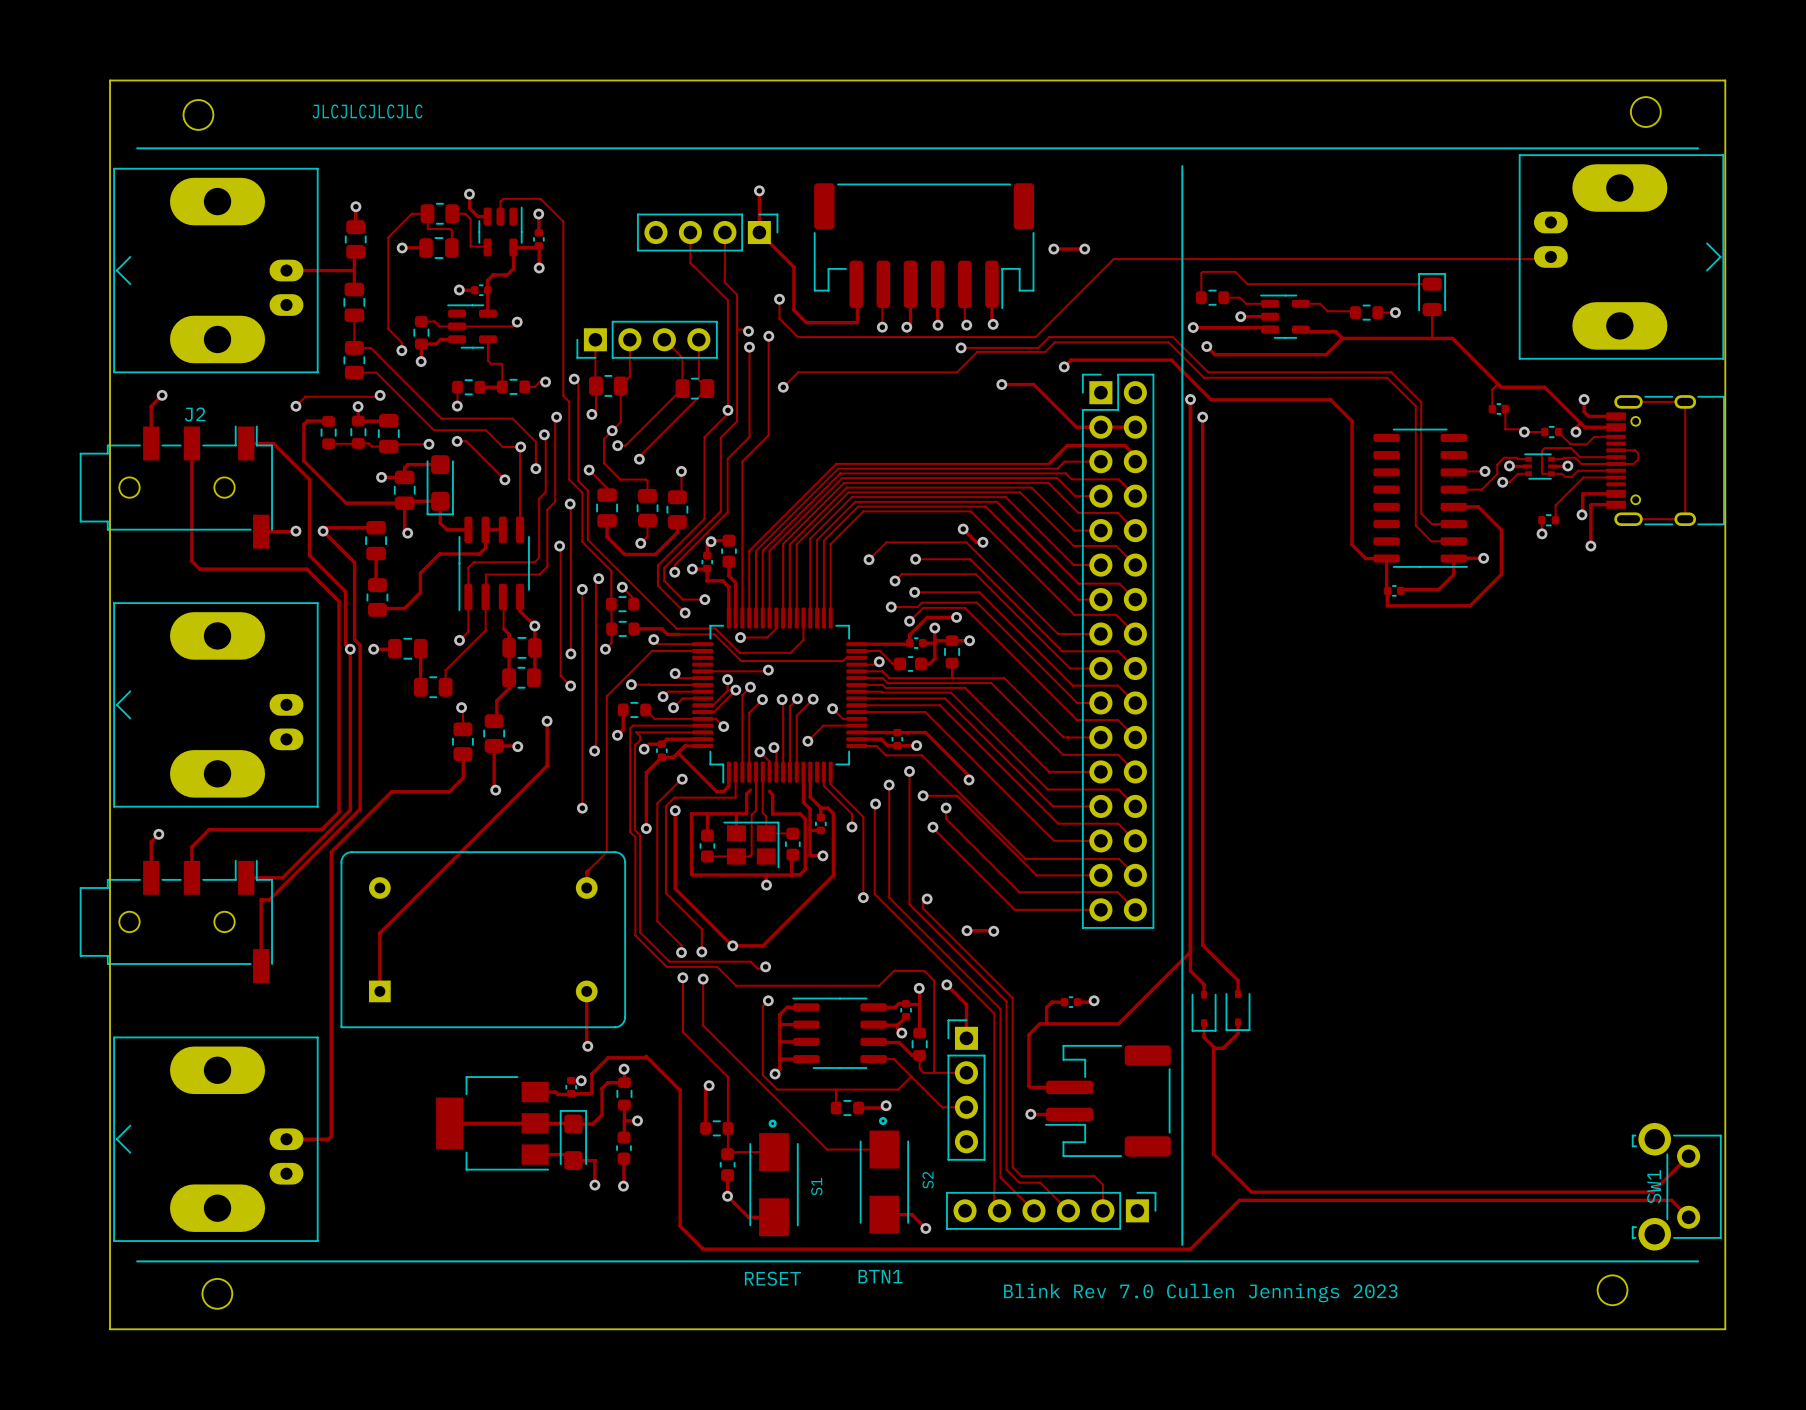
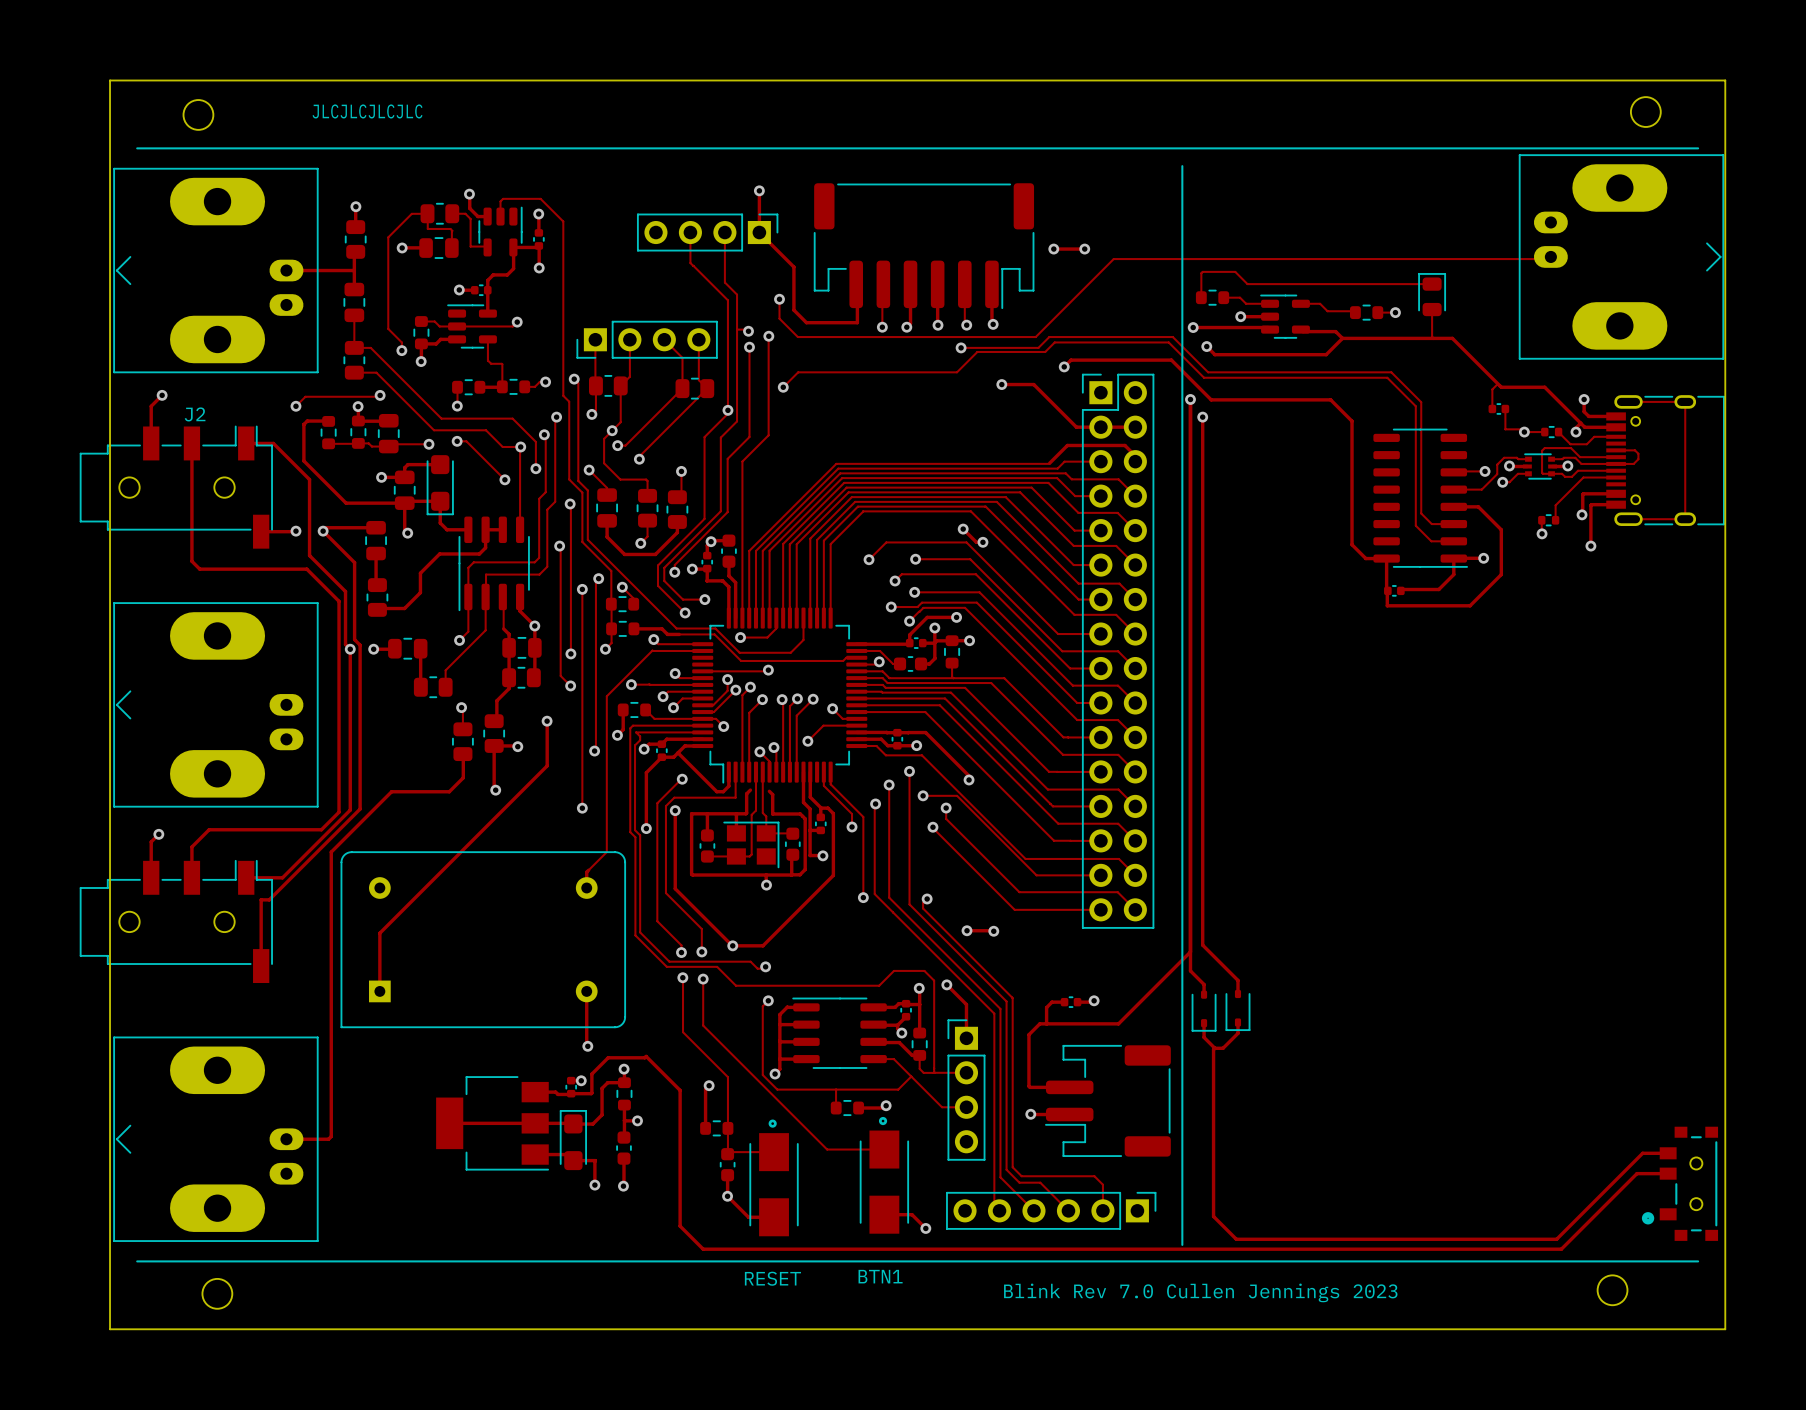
track: (1213, 1154) (1251, 1192) (1652, 1192) (1688, 1156) -> (1213, 1154) (1213, 1216) (1236, 1239) (1556, 1239) (1642, 1153) (1668, 1153)
S2 name: S2 (928, 1180) -> none
part: none -> (1679, 1183)
S1 name: S1 (816, 1186) -> none
SW1: (1676, 1186) -> none
track: (1688, 1217) (1671, 1200) (1239, 1200) (1190, 1249) -> (1668, 1173) (1636, 1173) (1561, 1249) (1190, 1249)

